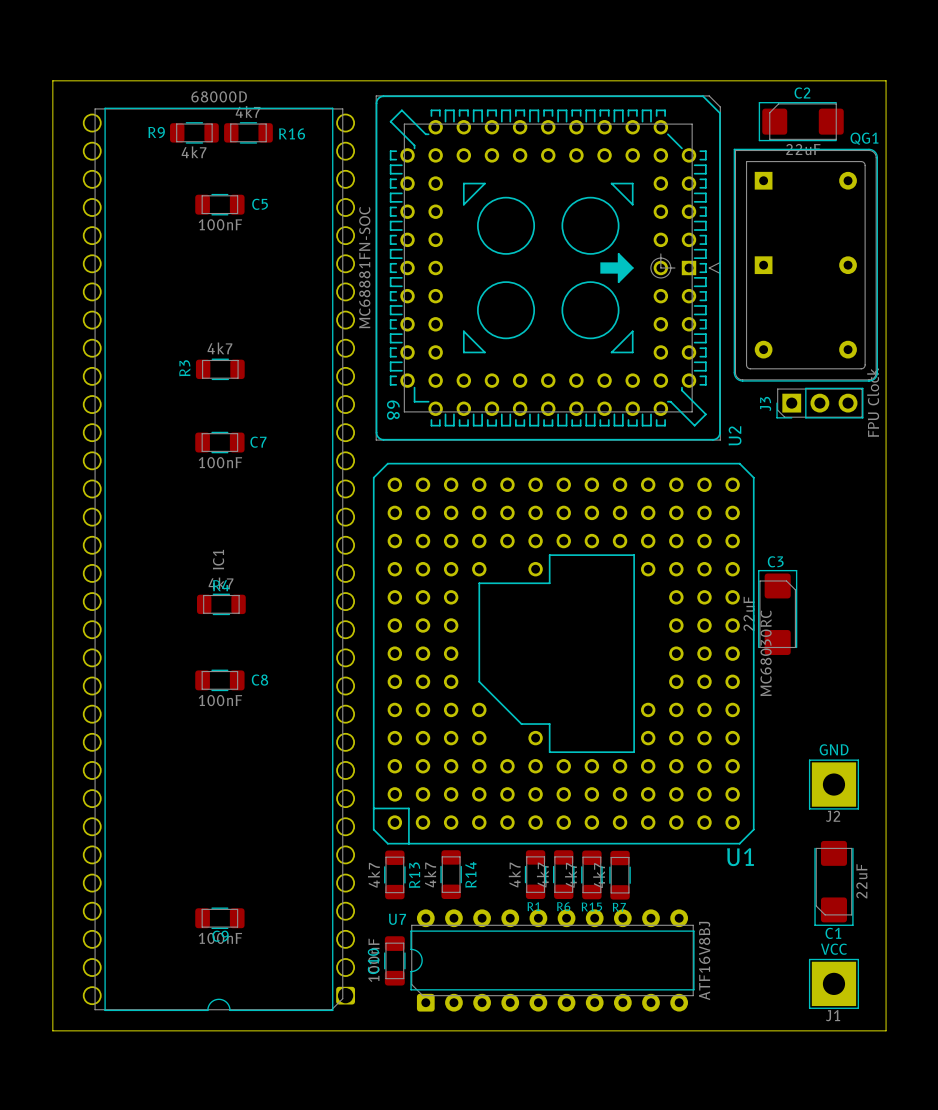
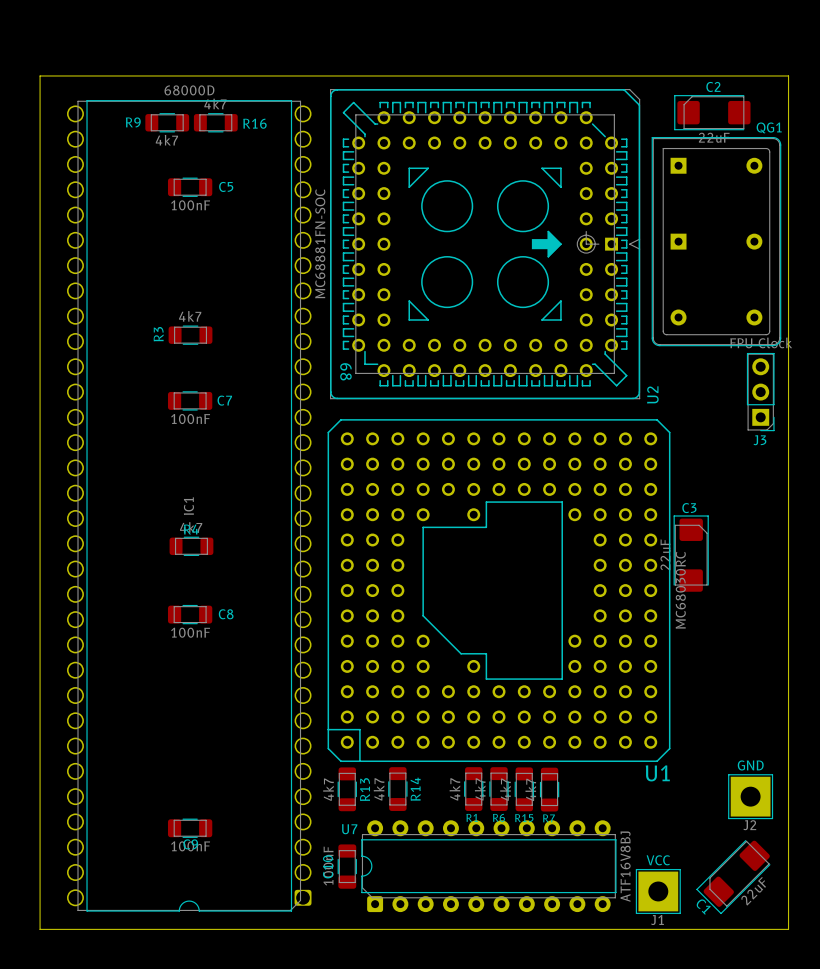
J3 rotation: 0° (819, 403) -> 90° counterclockwise (760, 392)
J2 position: (833, 784) -> (750, 796)
C1 rotation: 0° (833, 883) -> 45° clockwise (733, 877)
C1 position: (833, 883) -> (733, 877)
J1 position: (833, 983) -> (658, 891)

